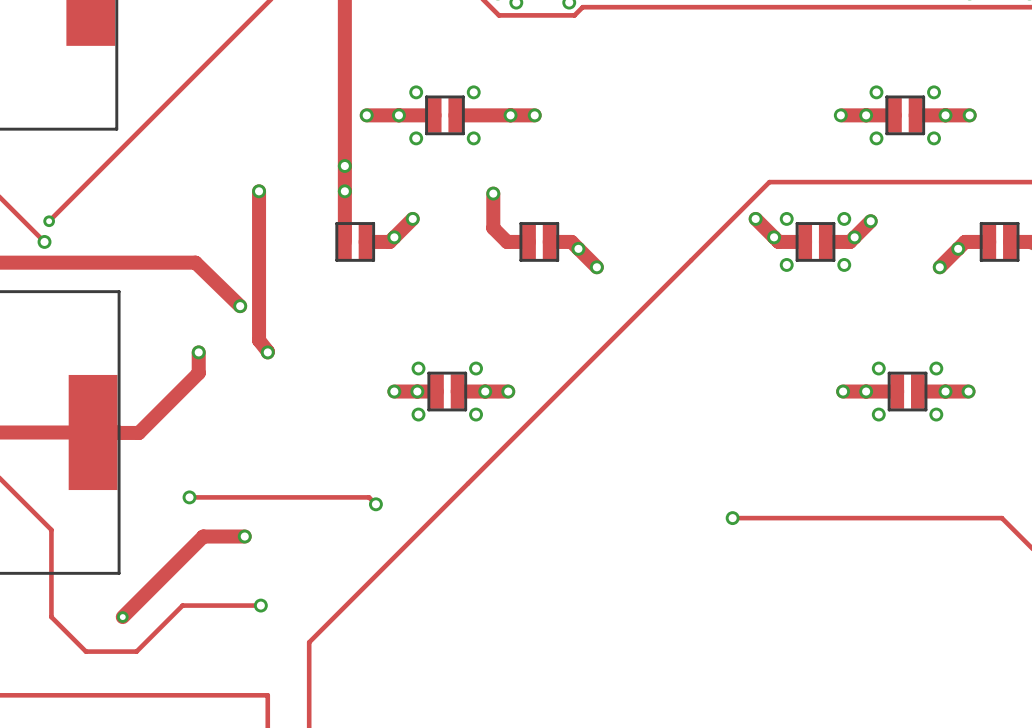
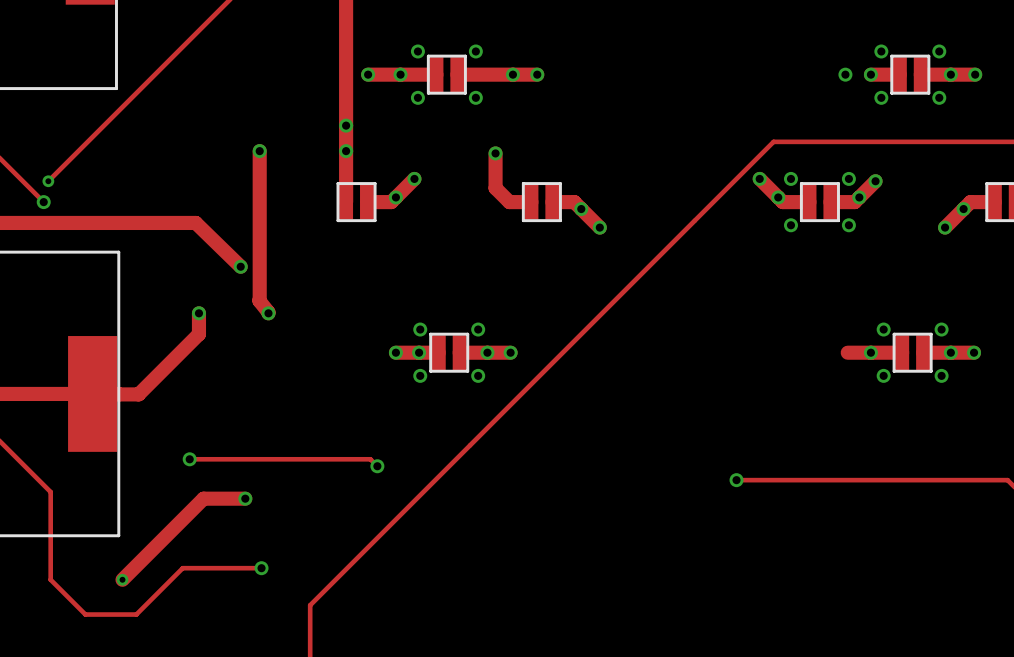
track: (841, 115) (866, 115) -> none
via: (843, 391) -> none

